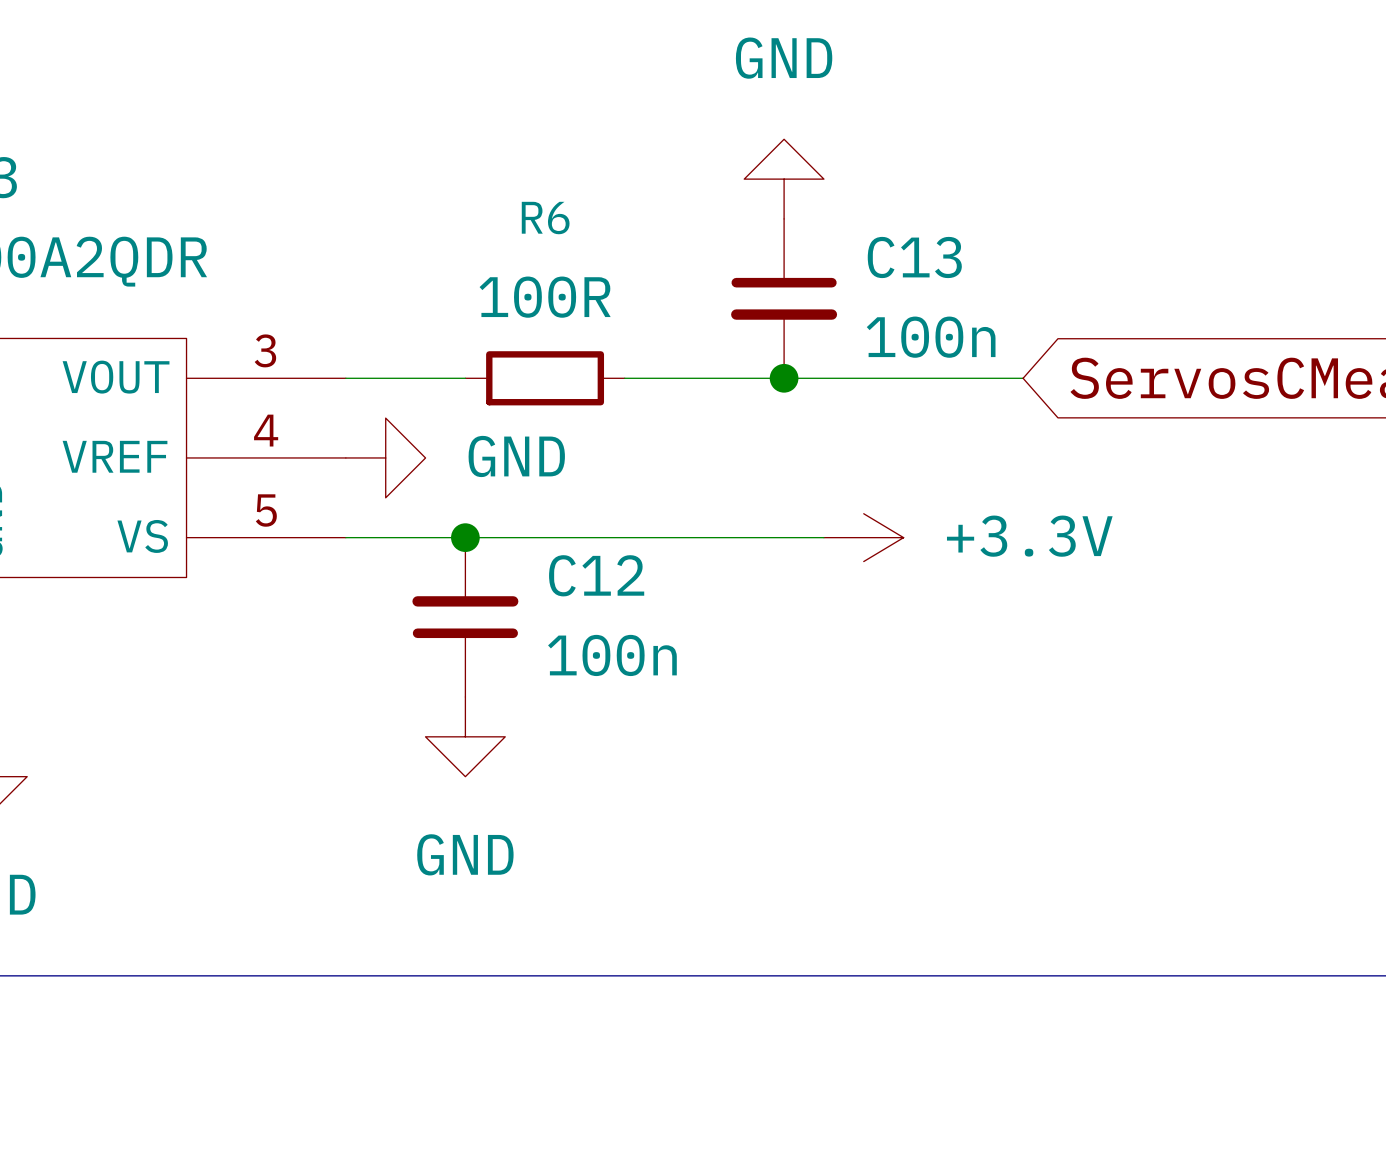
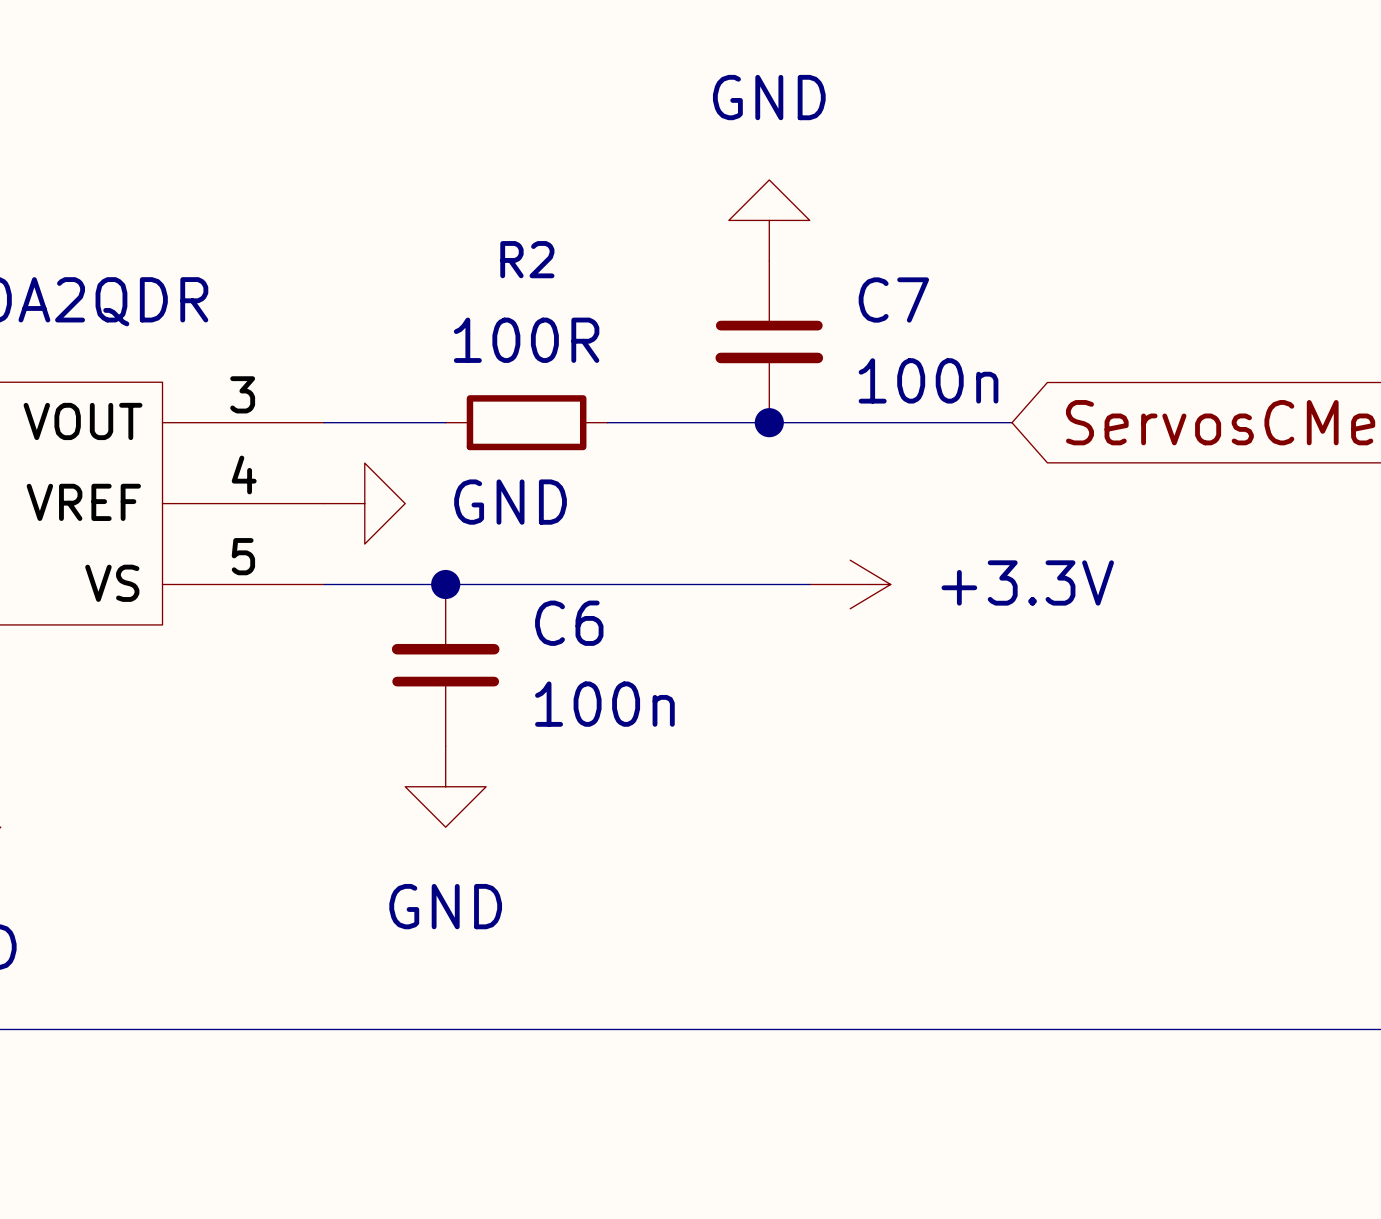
R6 name: R6 (545, 218) -> R2 (527, 259)
C13 name: C13 (914, 257) -> C7 (893, 300)
C12 name: C12 (596, 575) -> C6 (569, 623)

